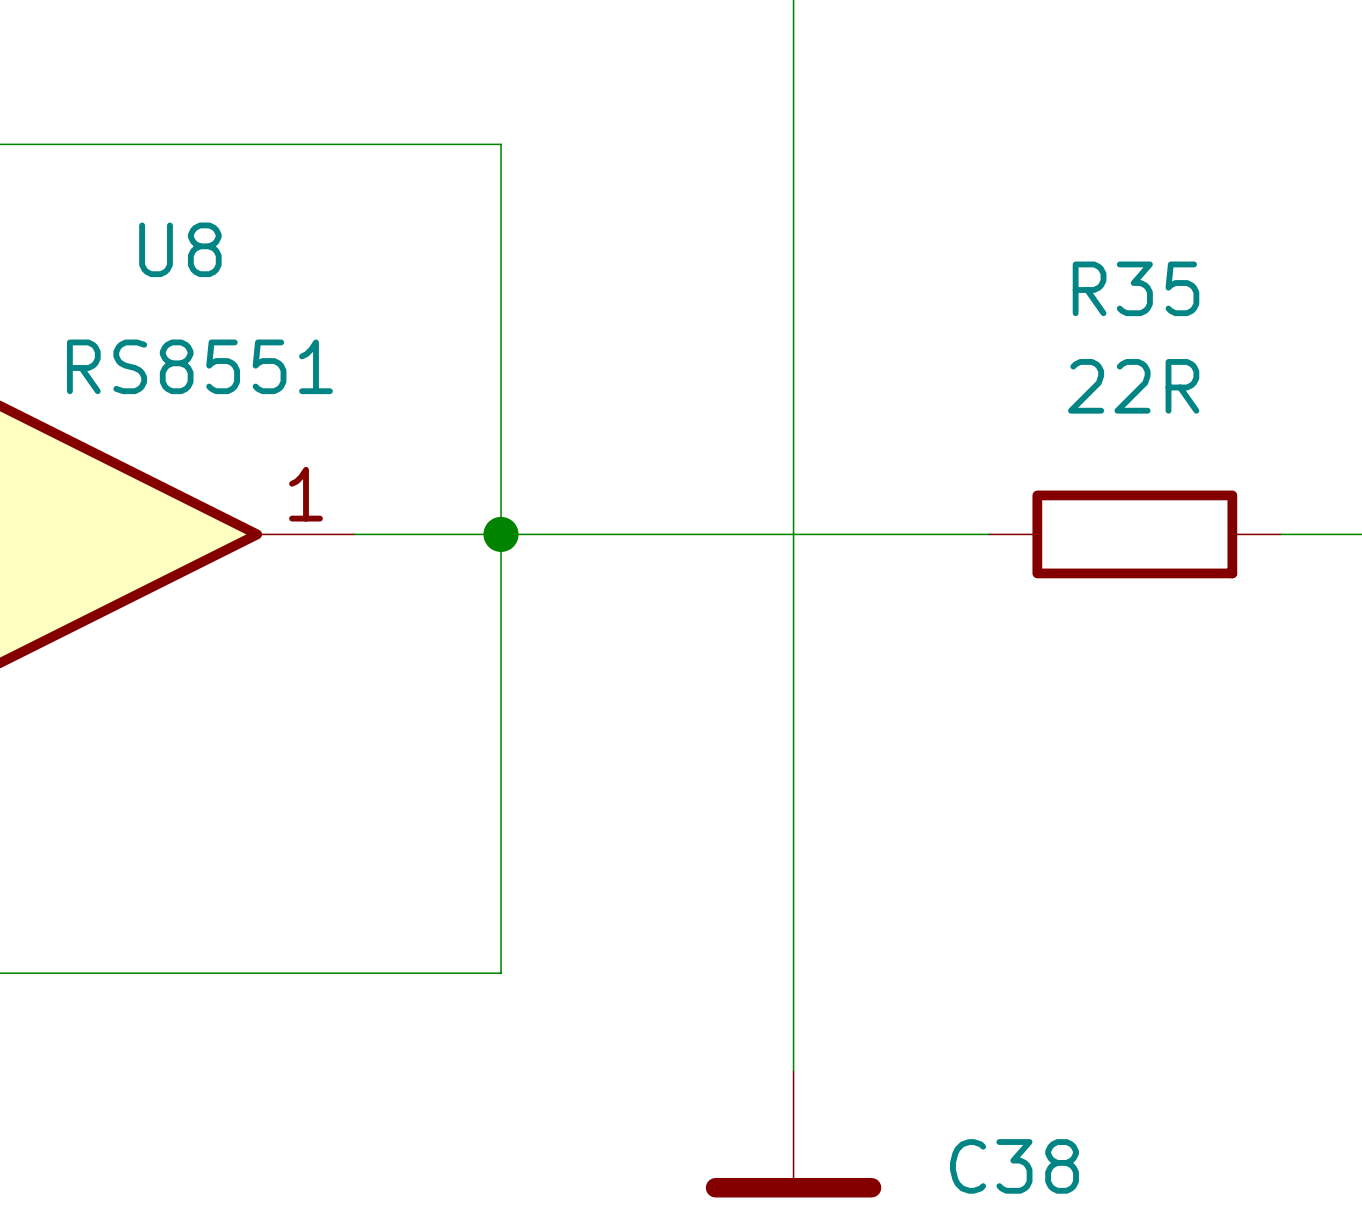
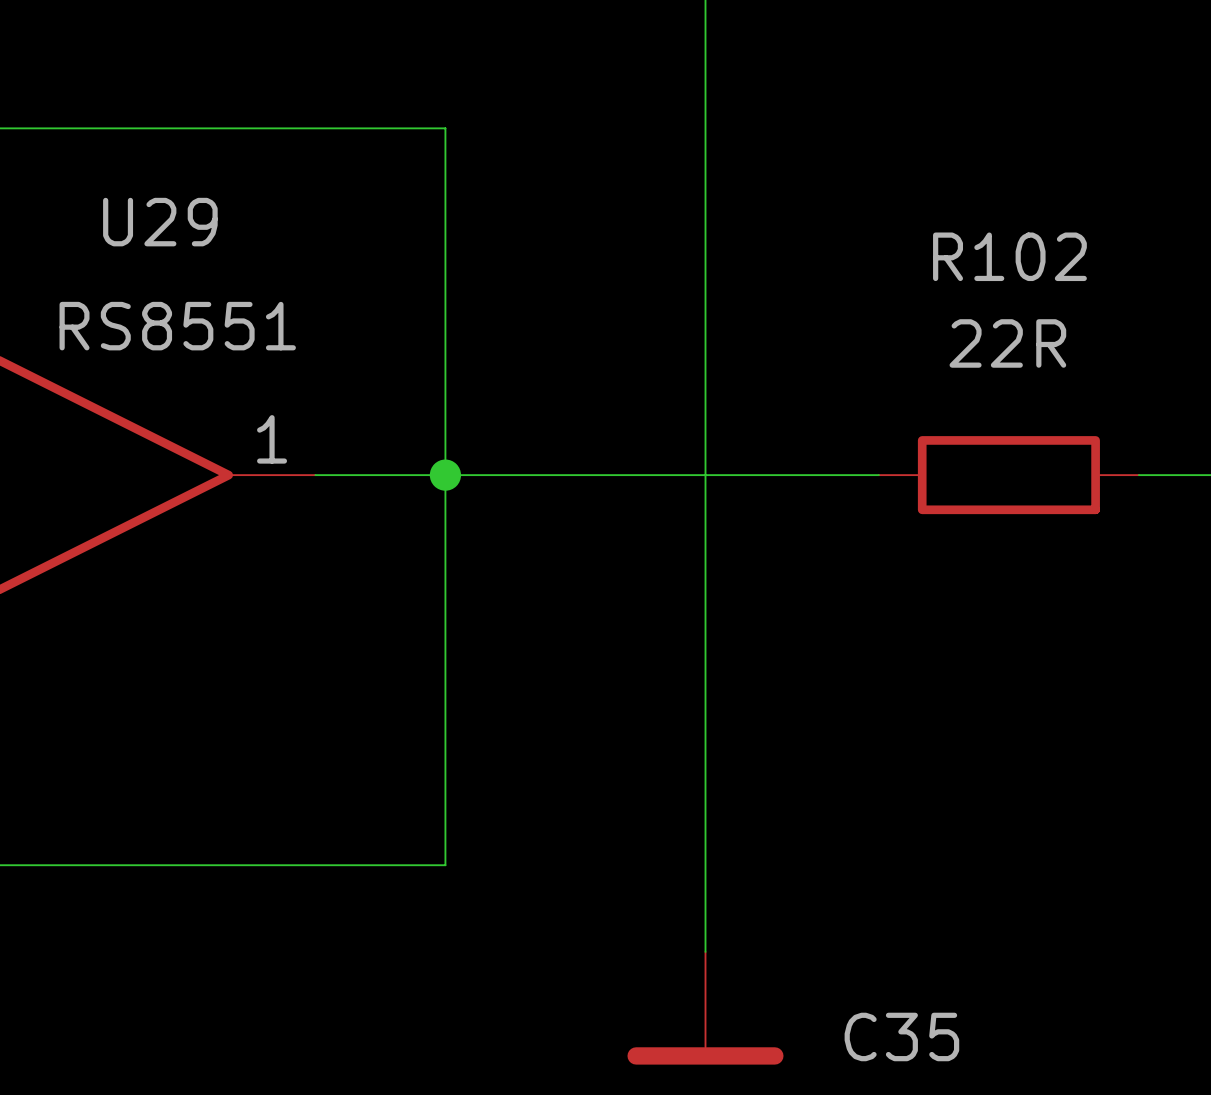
U8 name: U8 (180, 249) -> U29 (160, 222)
R35 name: R35 (1136, 288) -> R102 (1009, 256)
C38 name: C38 (1014, 1166) -> C35 (901, 1036)

